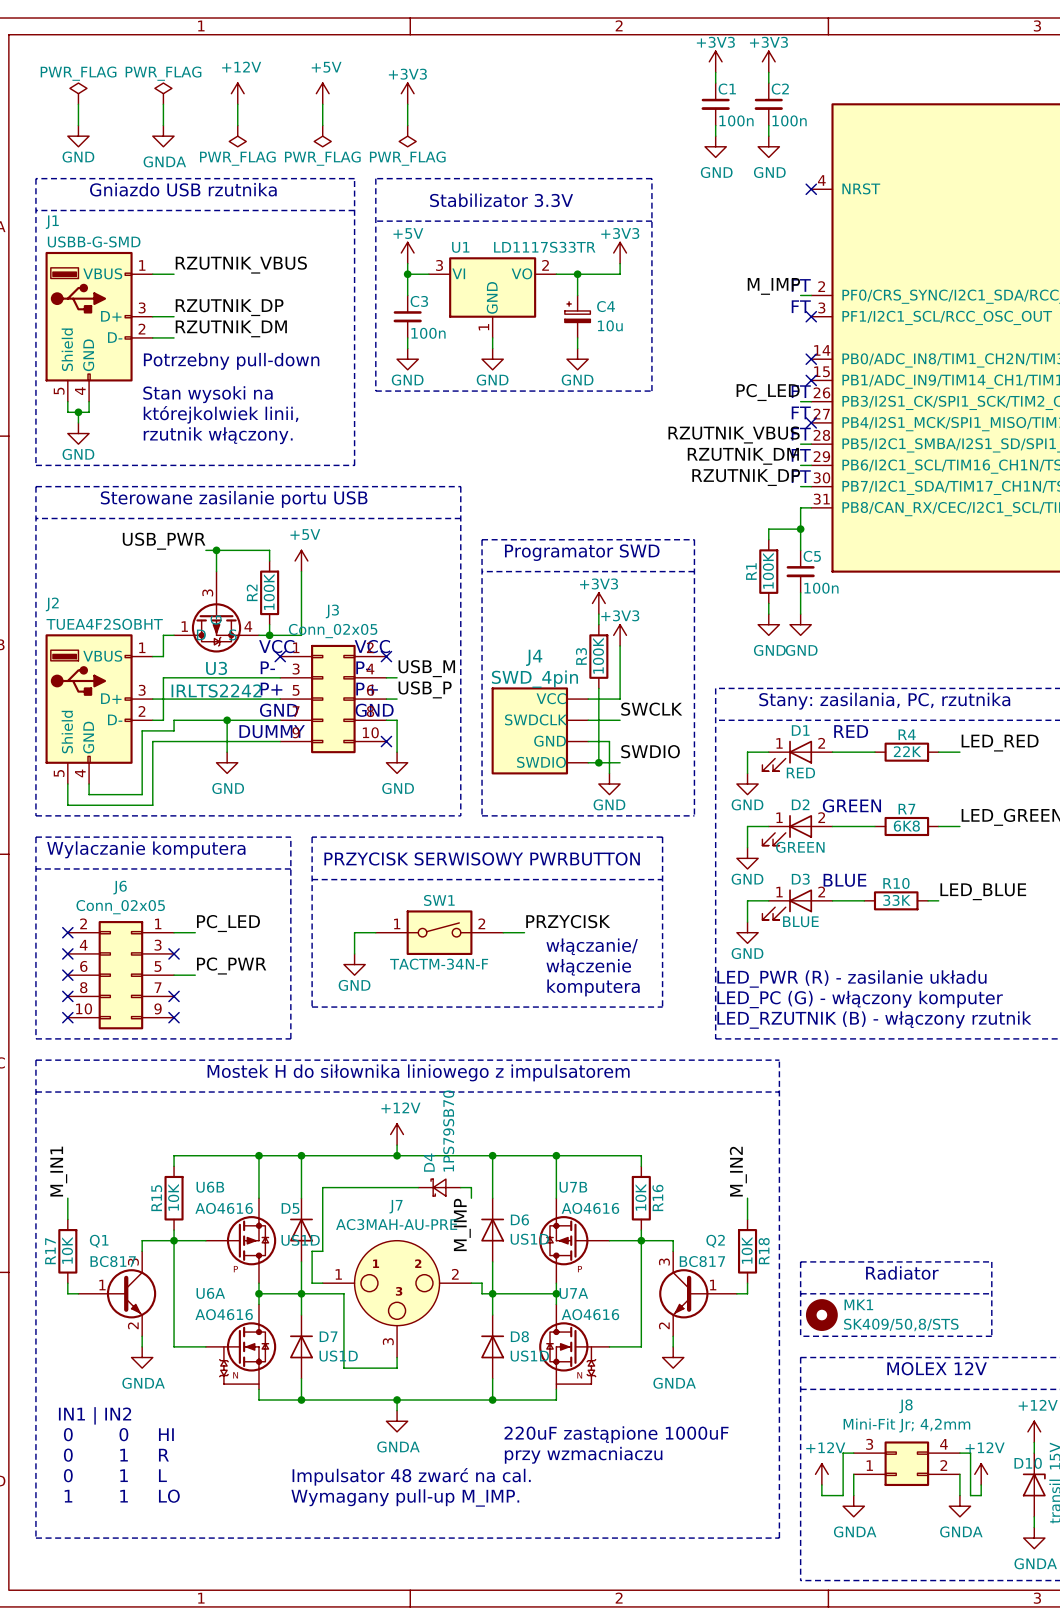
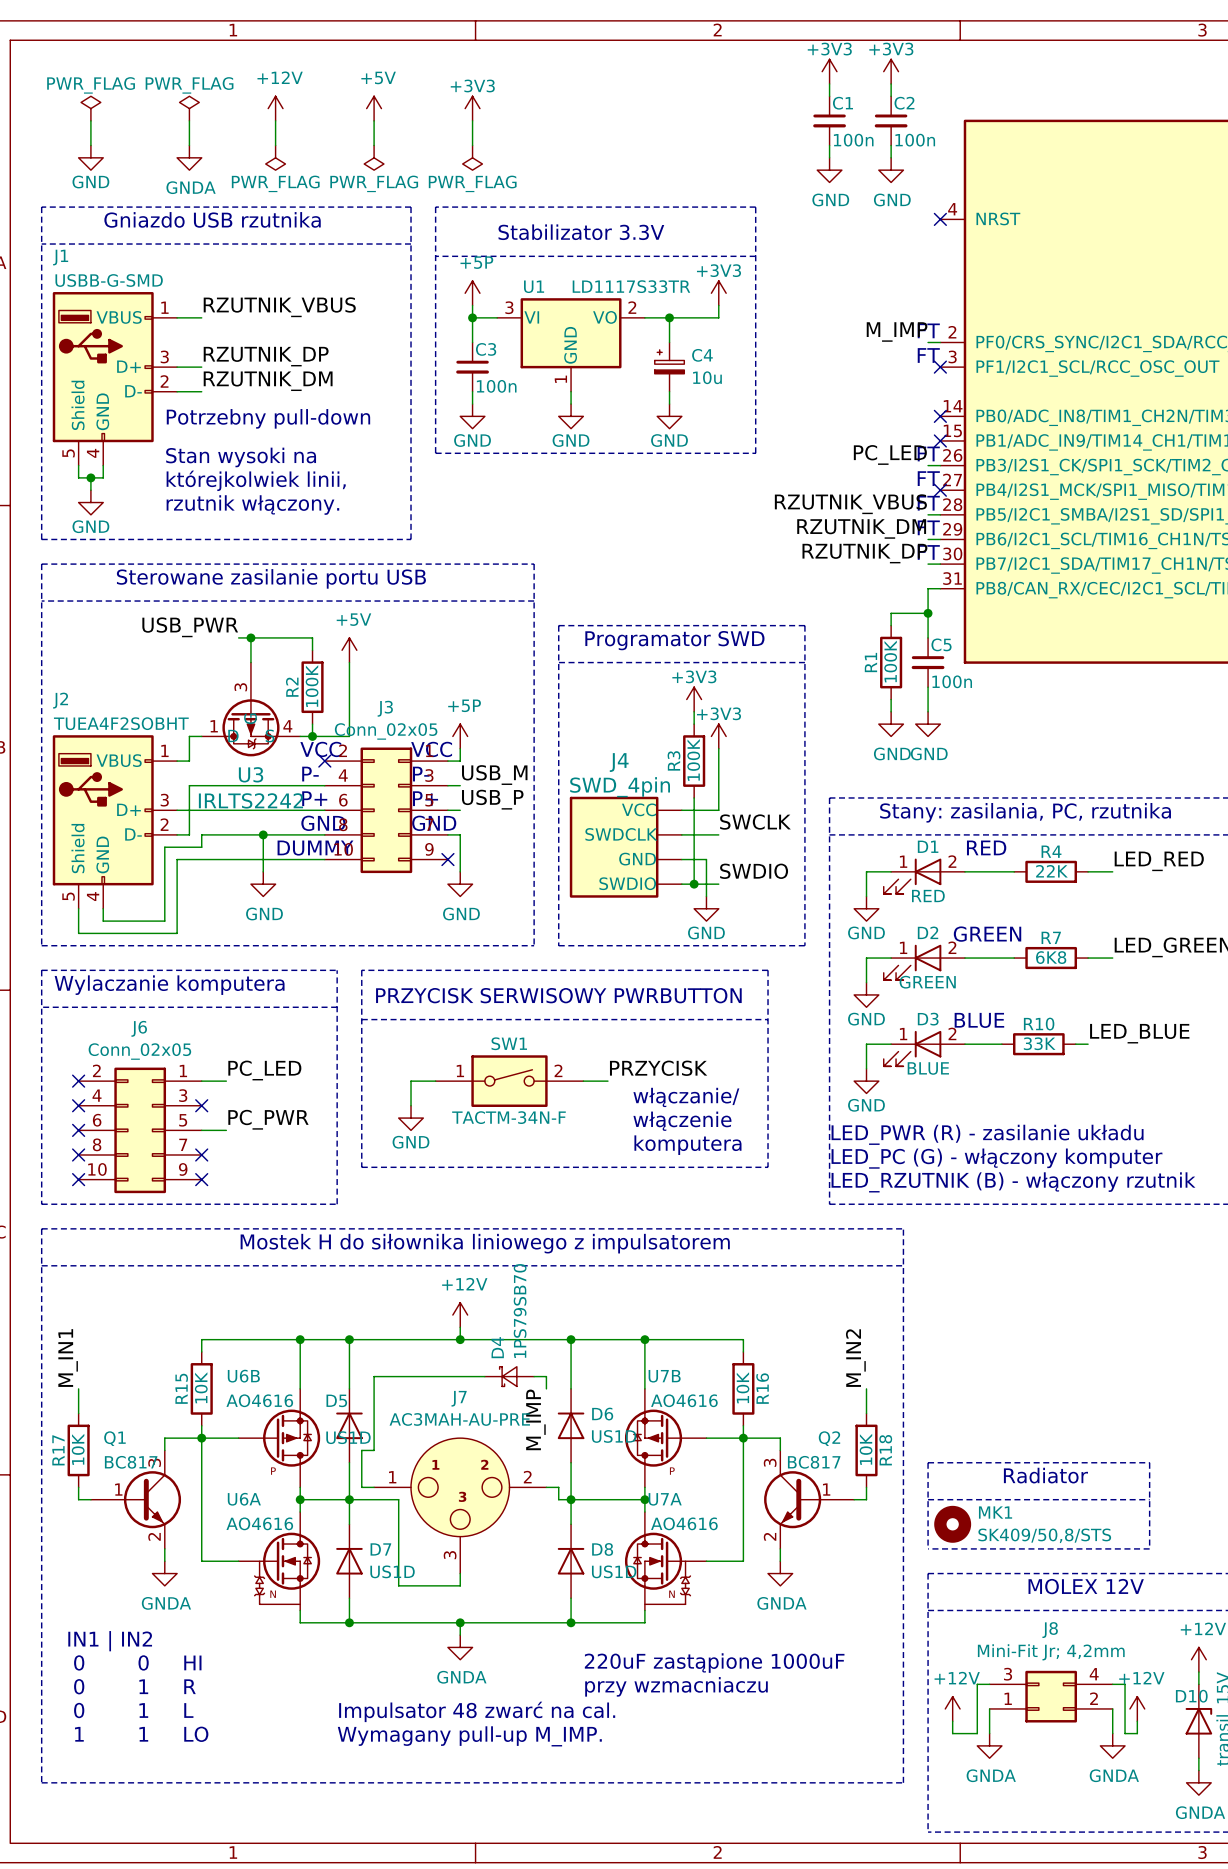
power symbol: +5V (407, 252) -> +5P (472, 293)
power symbol: none -> +5P (460, 736)
wire: none -> (460, 748) (460, 761) (447, 761)
no-connect mark: (386, 656) -> none
J3 flip: as is (333, 699) -> left-right (386, 810)

